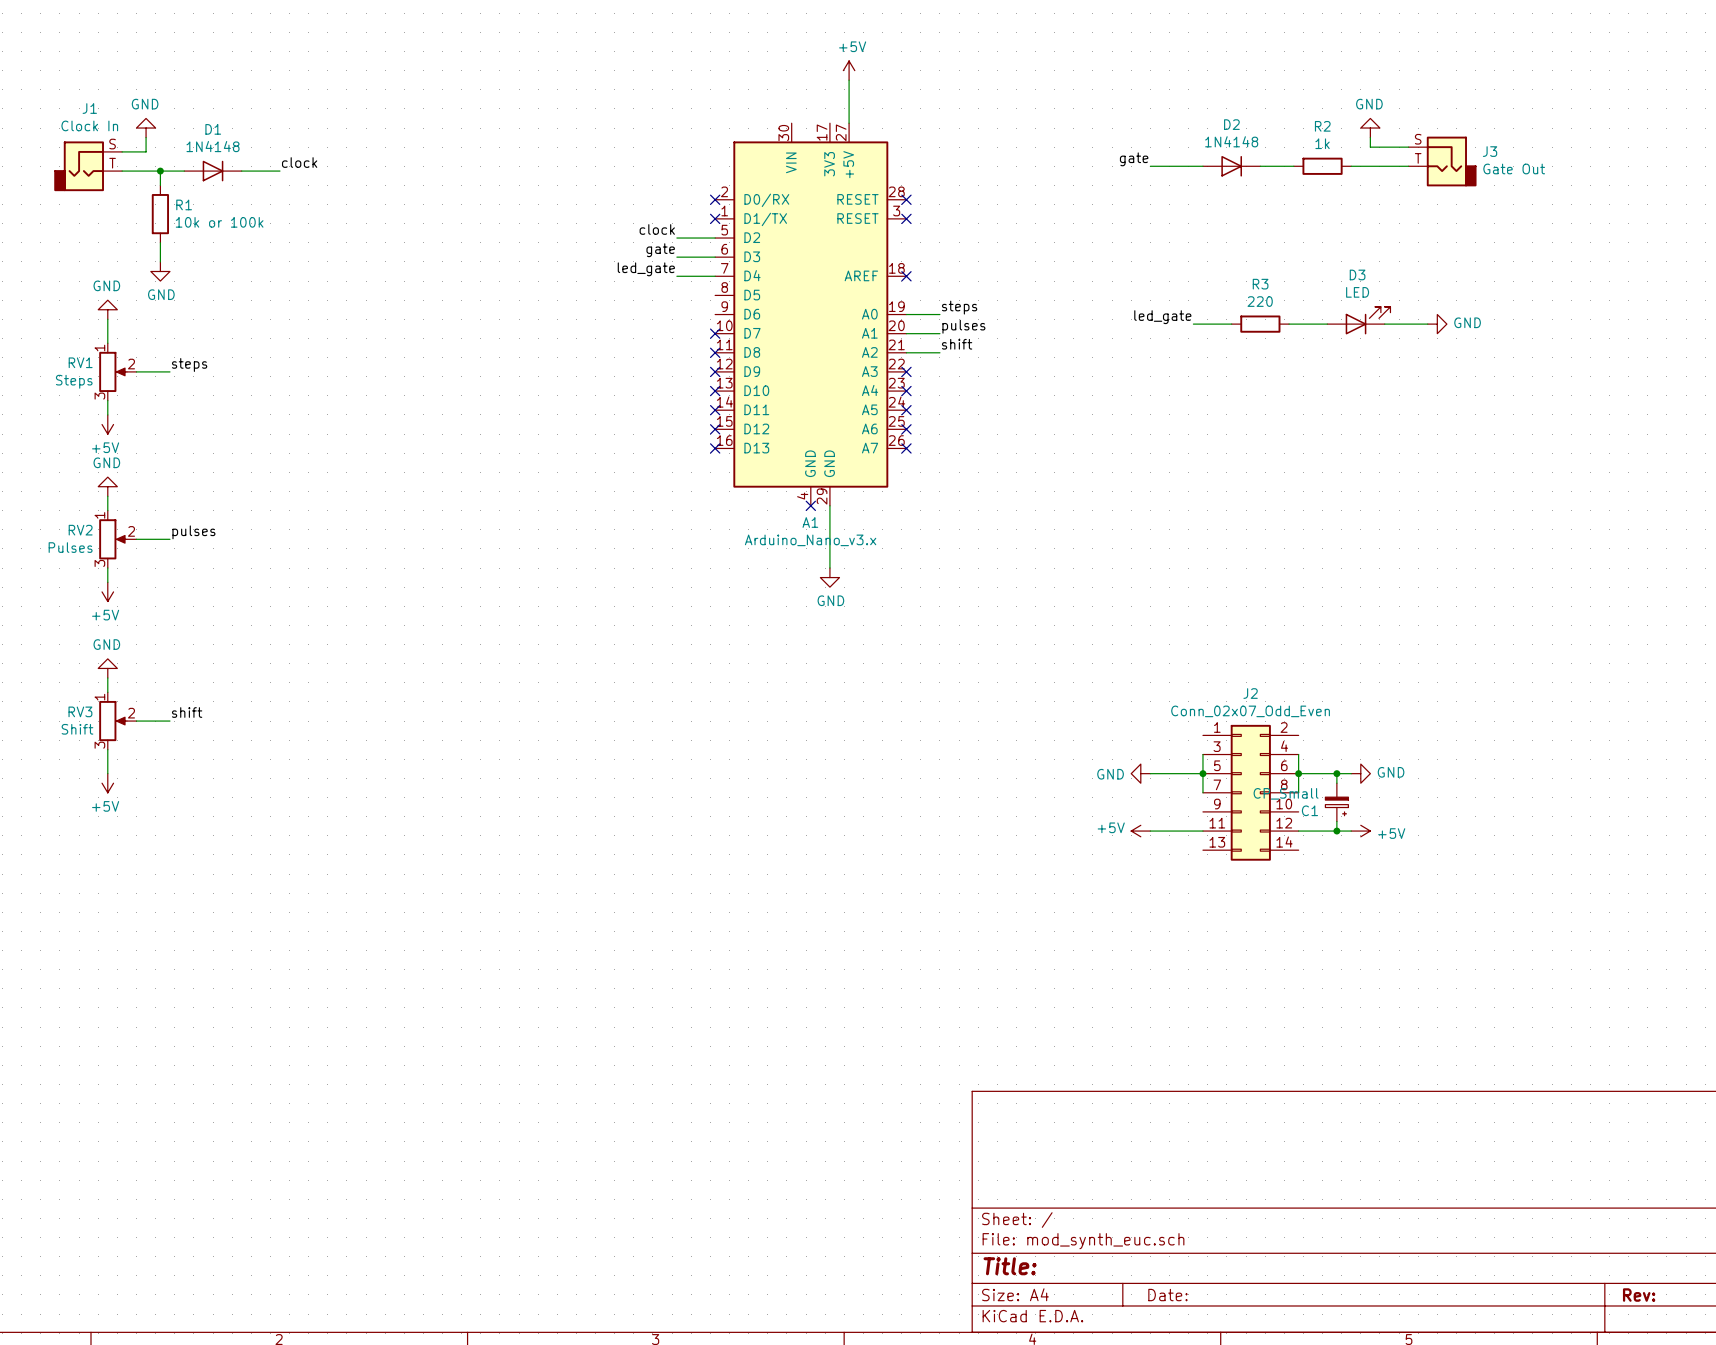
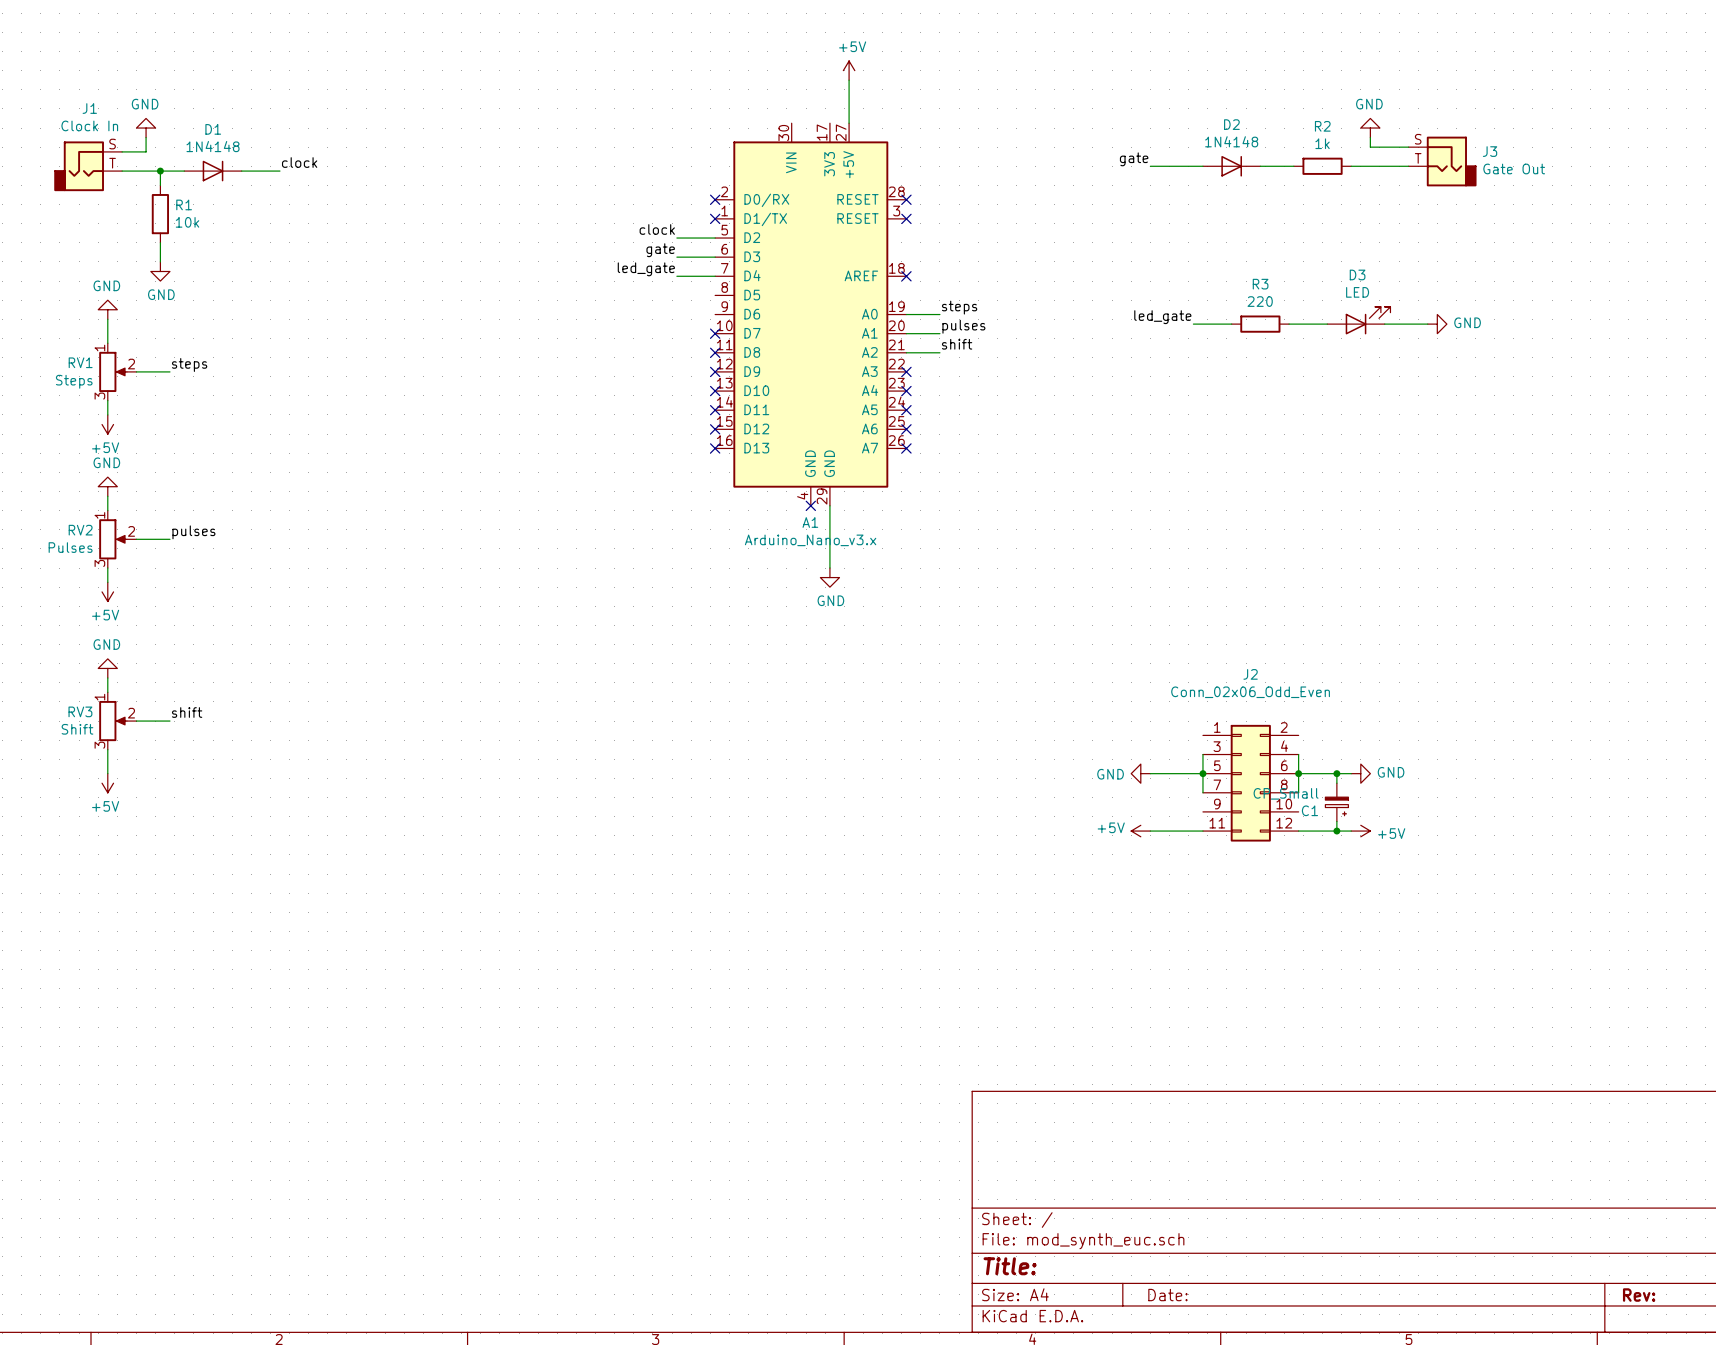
R1 value: 10k or 100k (219, 222) -> 10k (187, 222)
J2 value: Conn_02x07_Odd_Even (1250, 711) -> Conn_02x06_Odd_Even (1250, 692)
J2 symbol: [1202, 724, 1299, 861] -> [1202, 724, 1299, 842]

